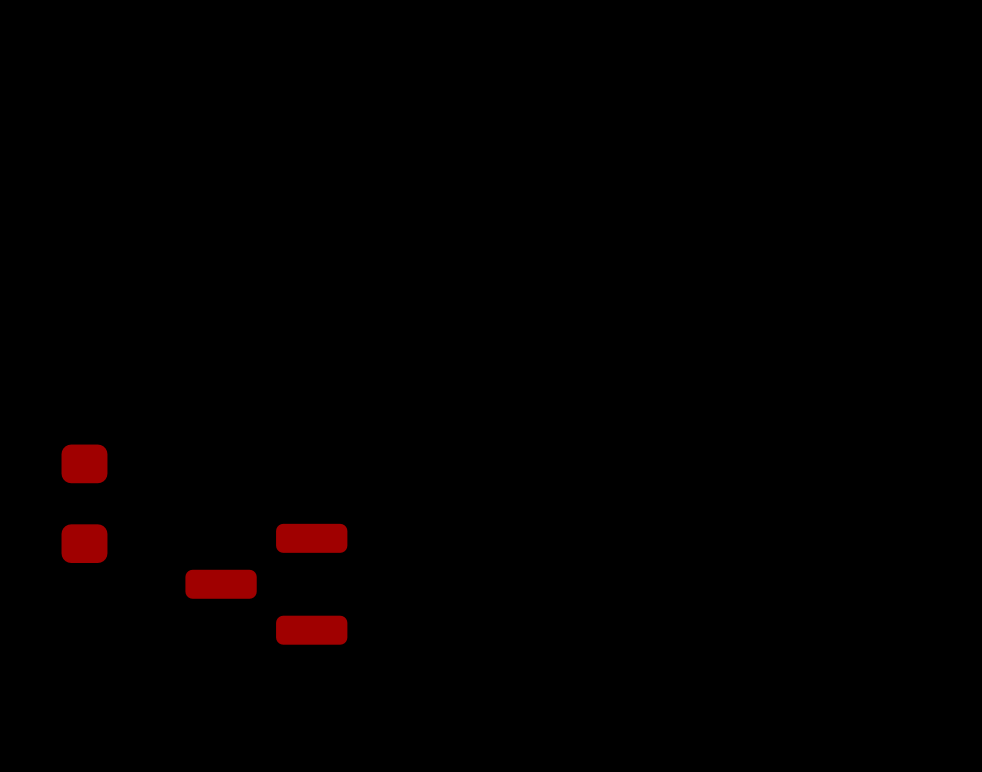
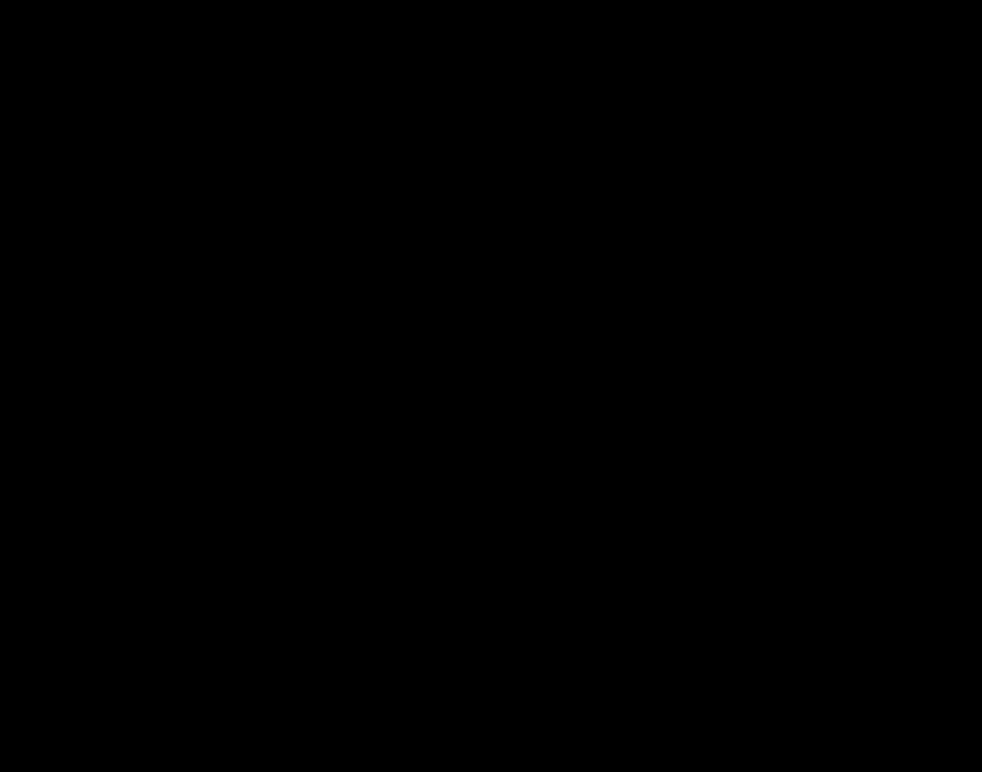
part: (84, 503) -> none
part: (266, 584) -> none

